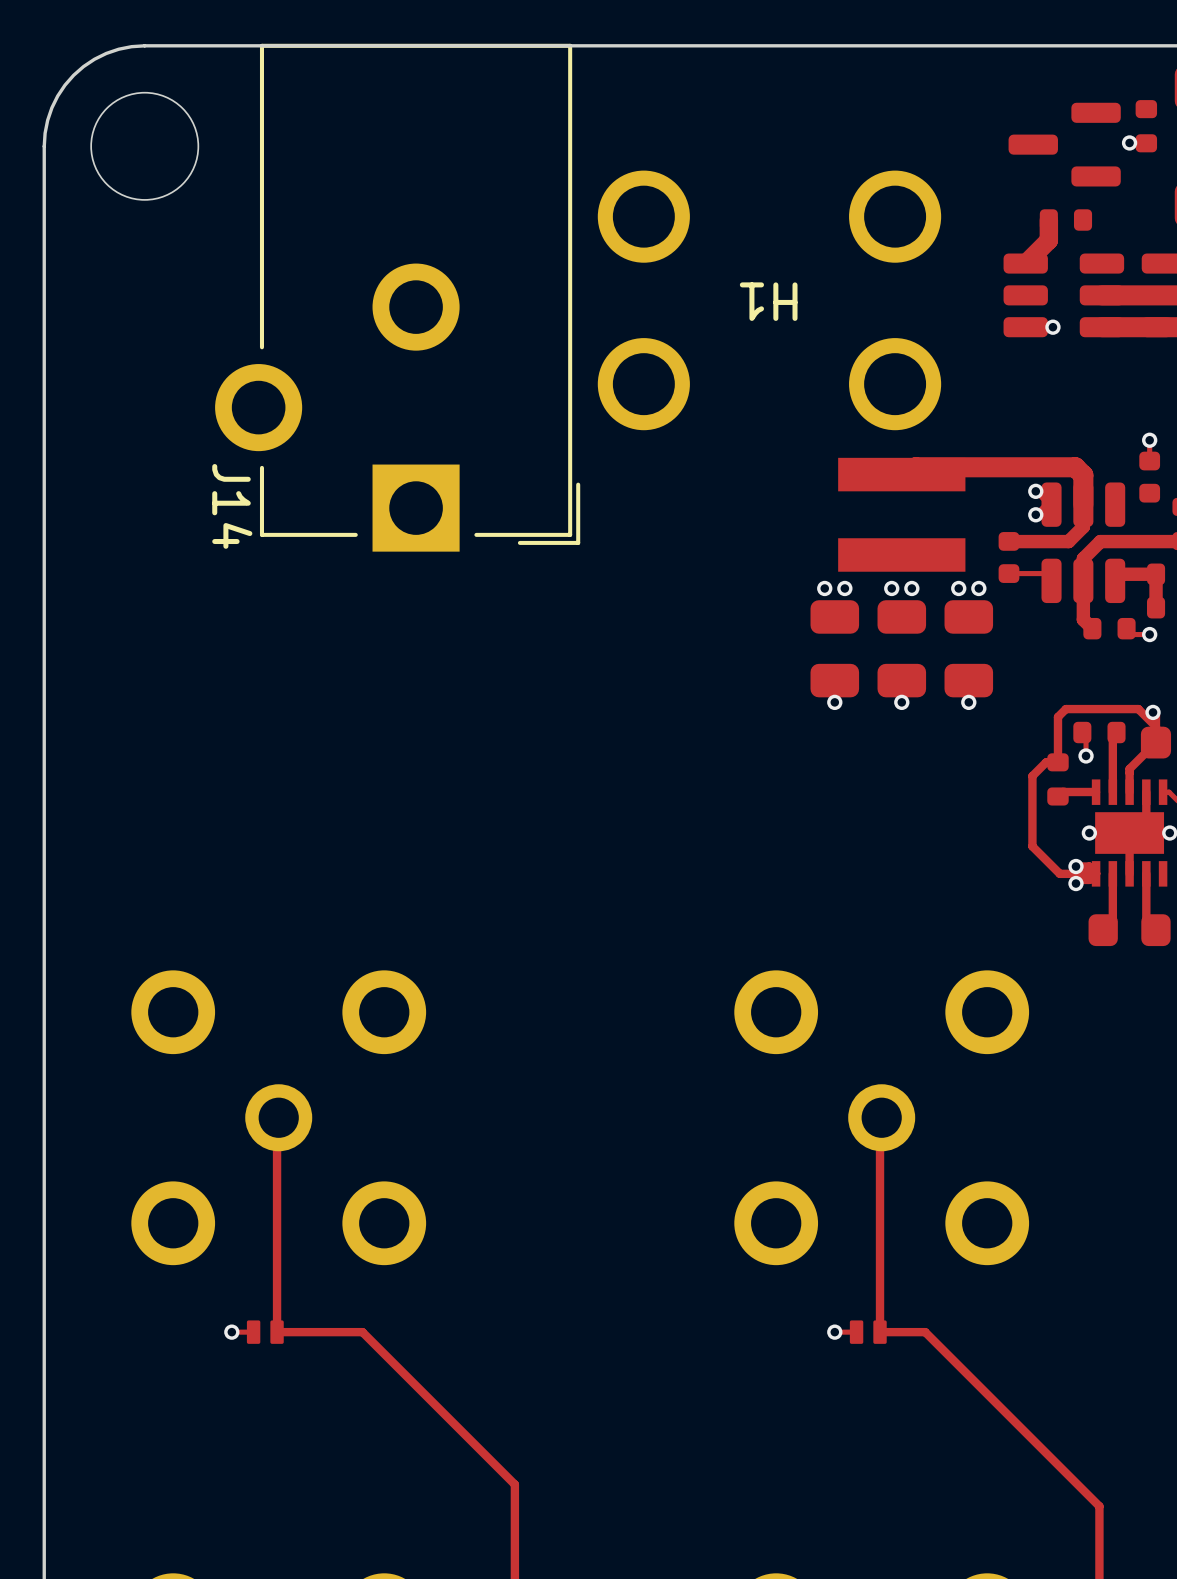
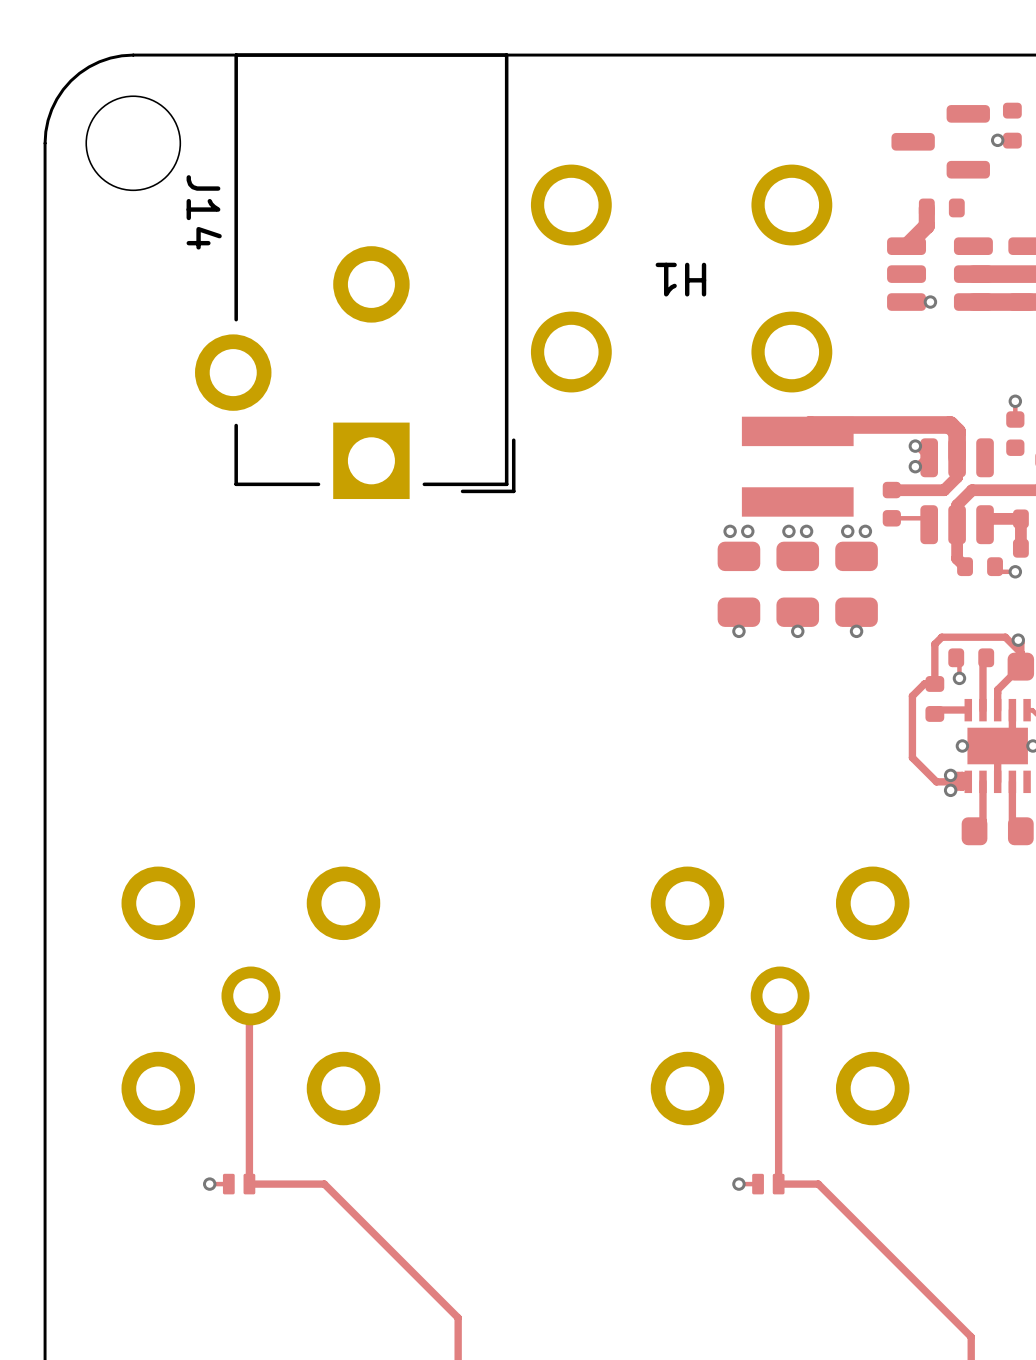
J14 name position: J14 (232, 506) -> J14 (204, 212)

